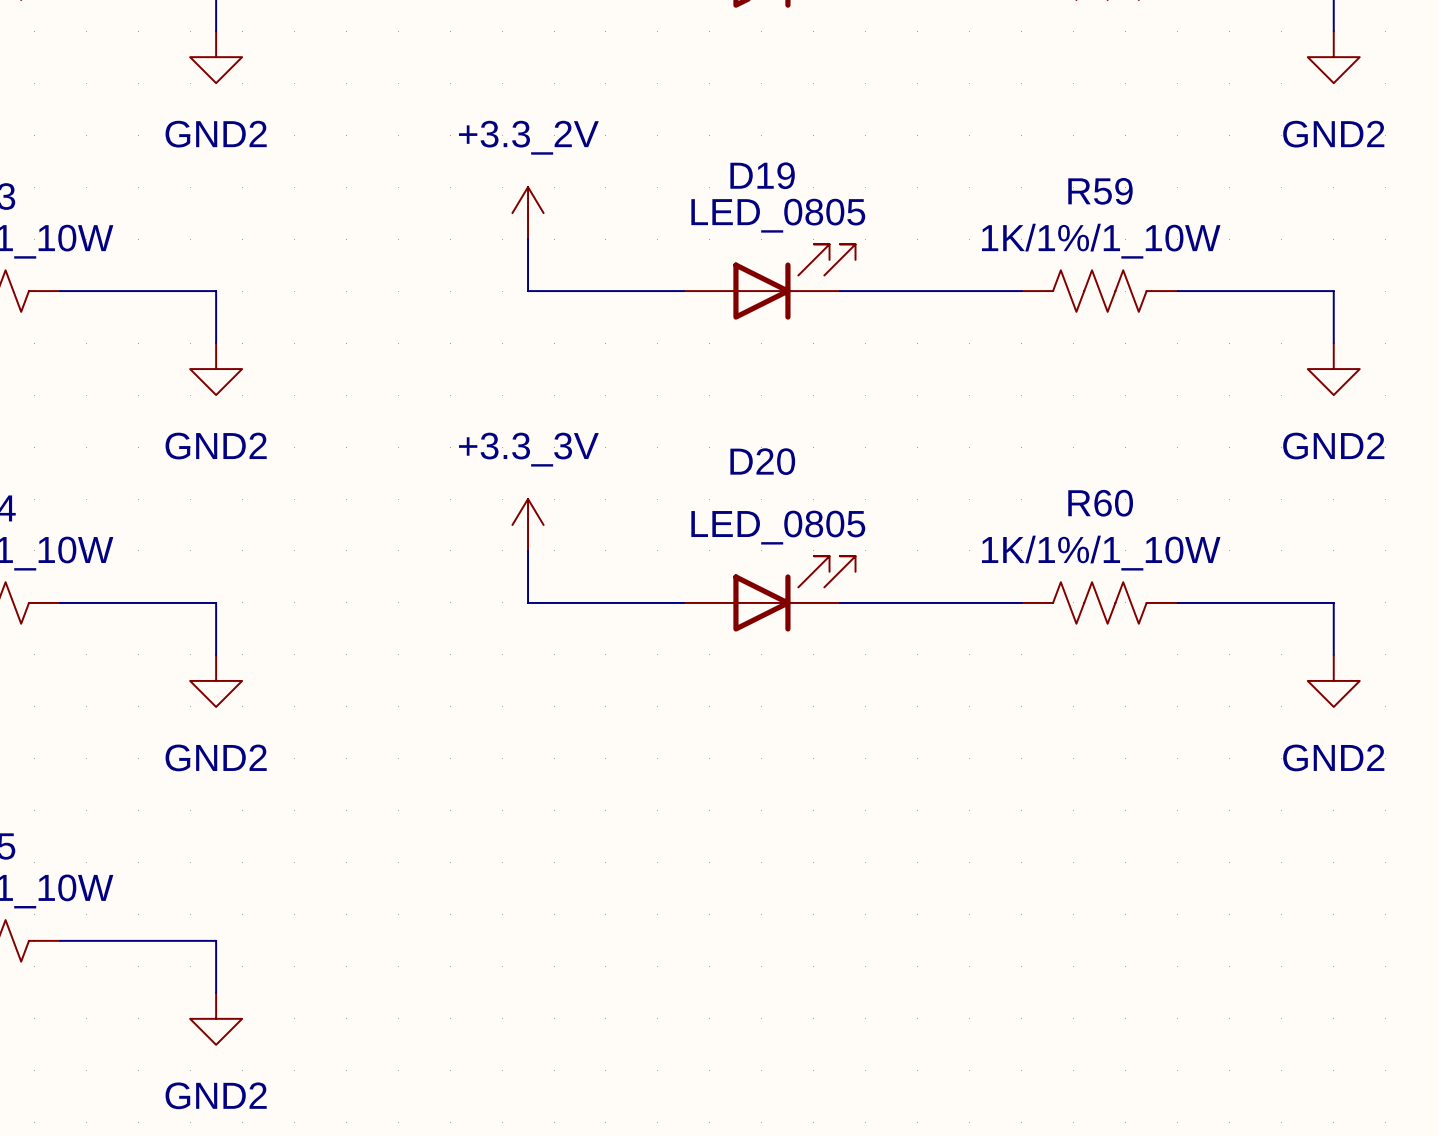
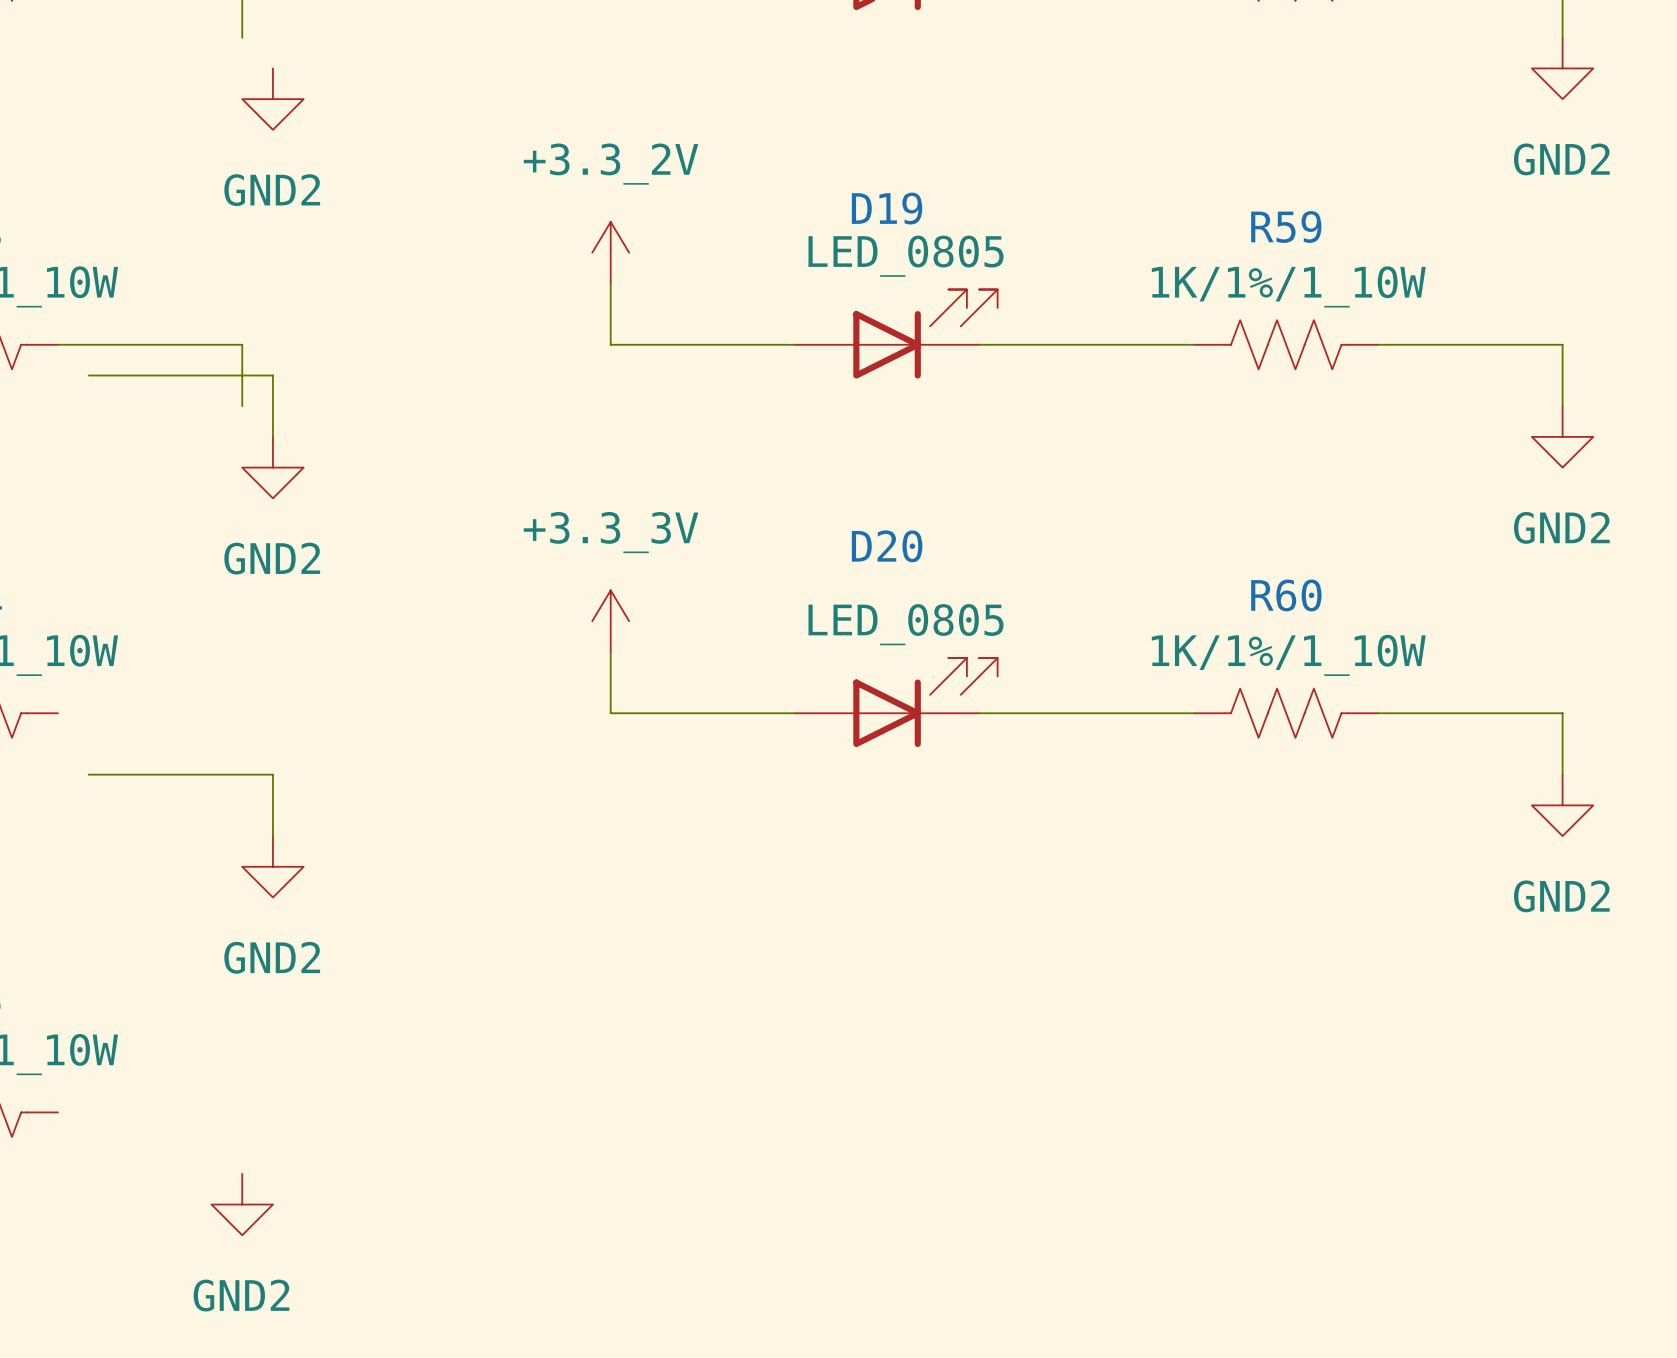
power symbol position: GND2 (216, 57) -> GND2 (272, 99)
power symbol position: GND2 (216, 369) -> GND2 (272, 467)
wire: (60, 602) (216, 602) (216, 654) -> (88, 375) (272, 375) (272, 436)
power symbol position: GND2 (216, 680) -> GND2 (272, 866)
wire: (60, 940) (216, 940) (216, 992) -> (88, 774) (272, 774) (272, 836)

